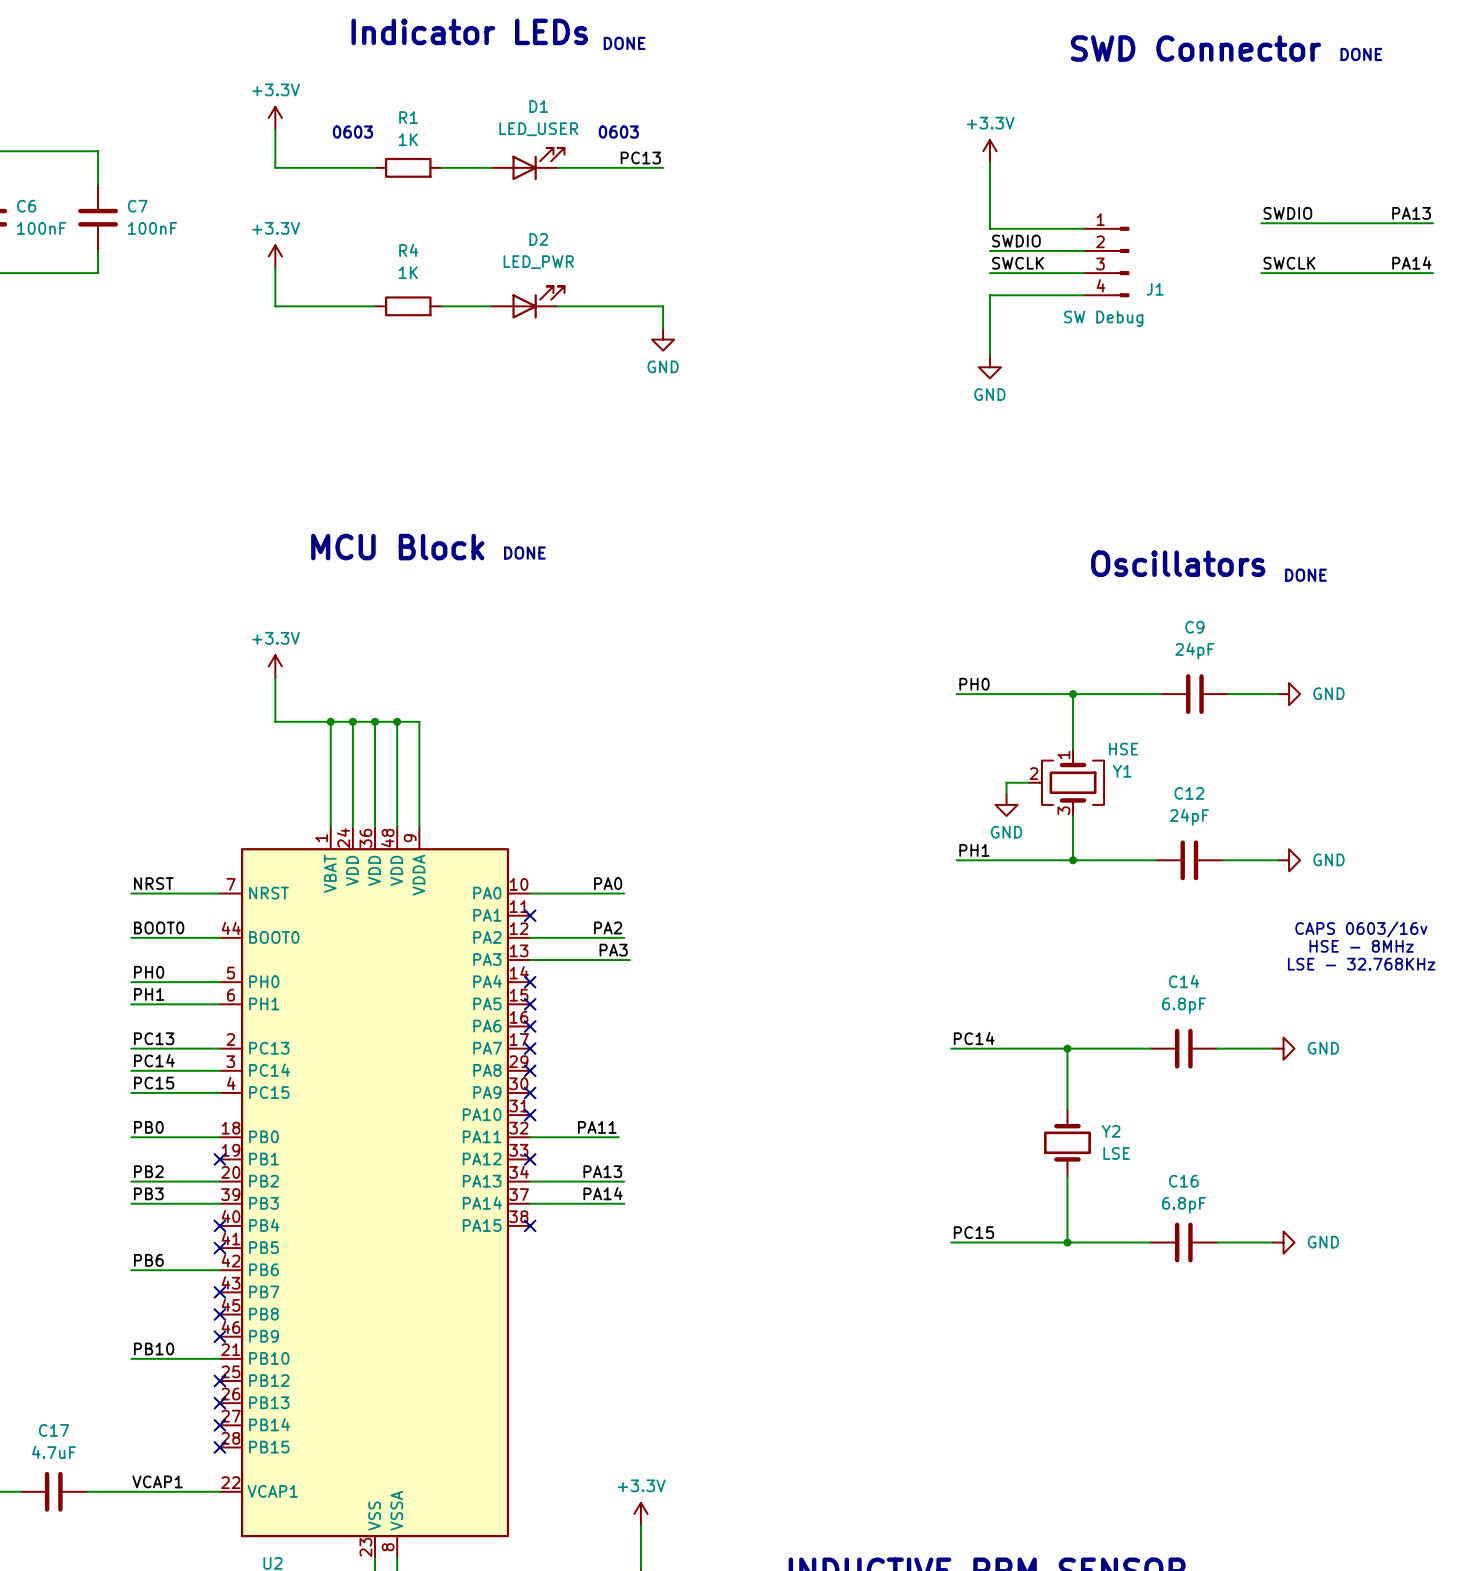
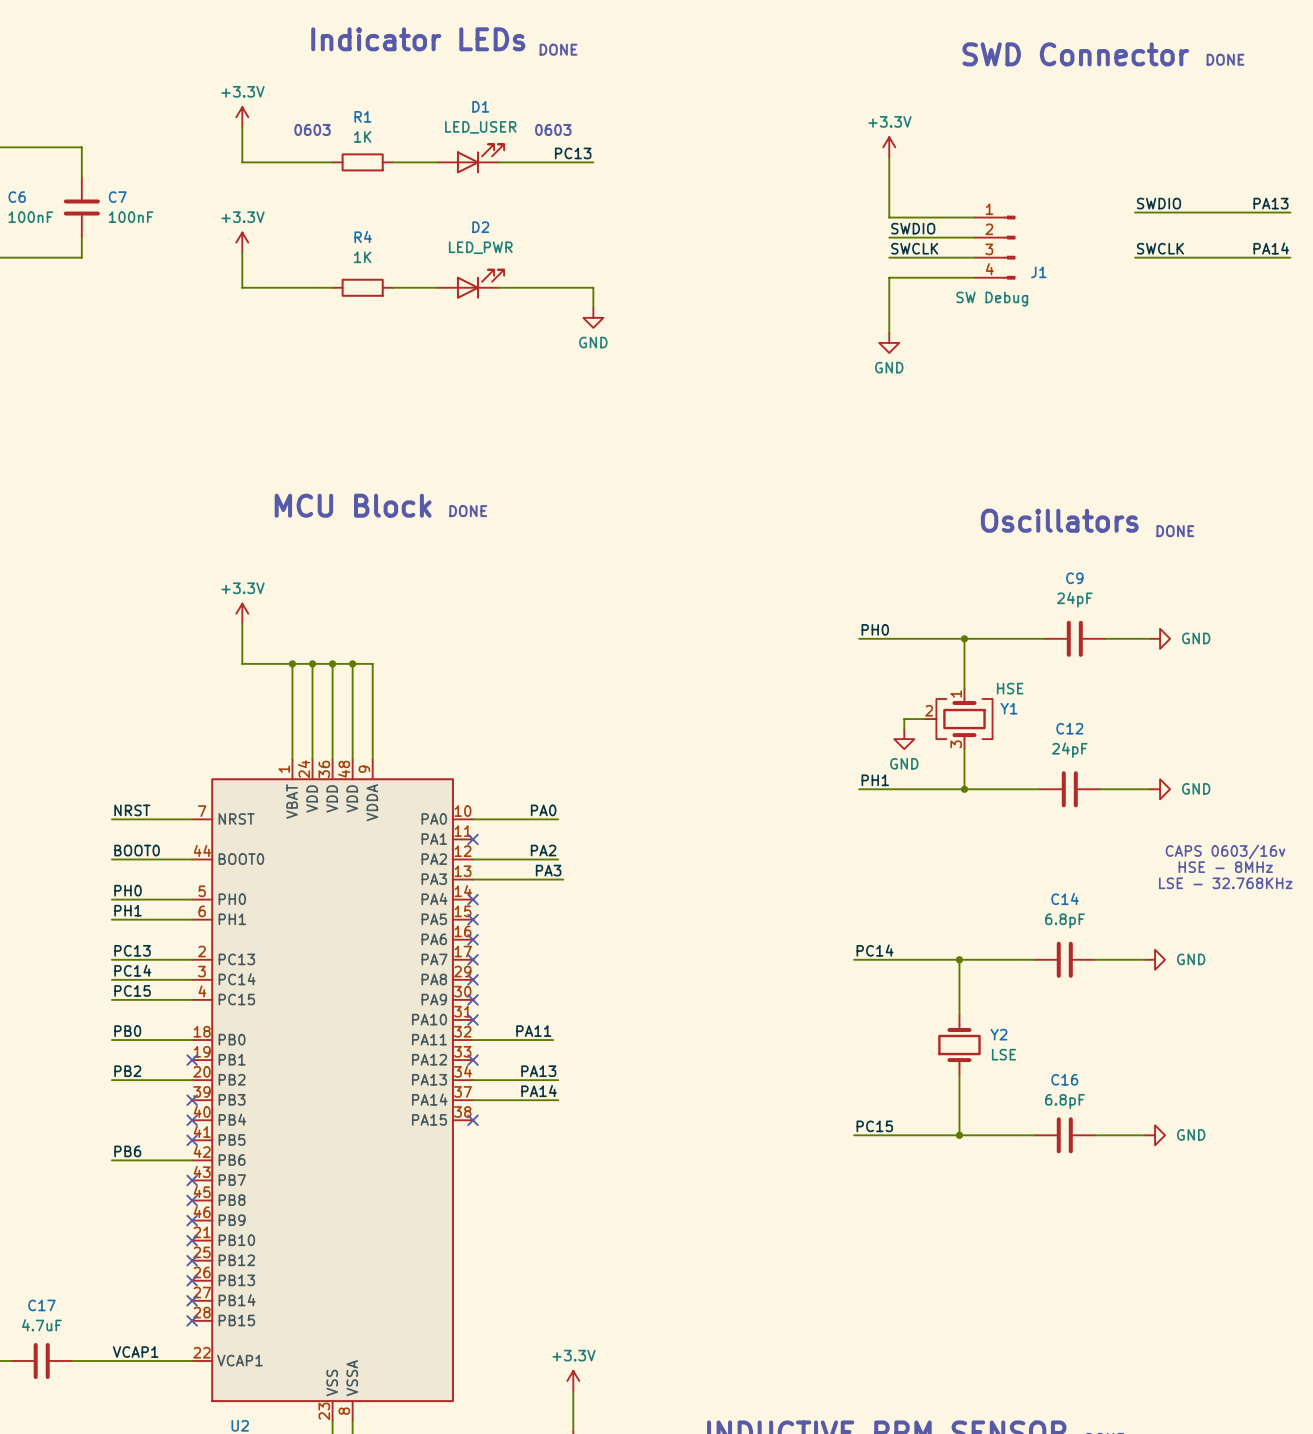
label: PB3 (148, 1193) -> none
wire: (131, 1203) (219, 1203) -> none
no-connect mark: none -> (192, 1100)
label: PB10 (154, 1348) -> none
wire: (131, 1358) (219, 1358) -> none
no-connect mark: none -> (192, 1240)

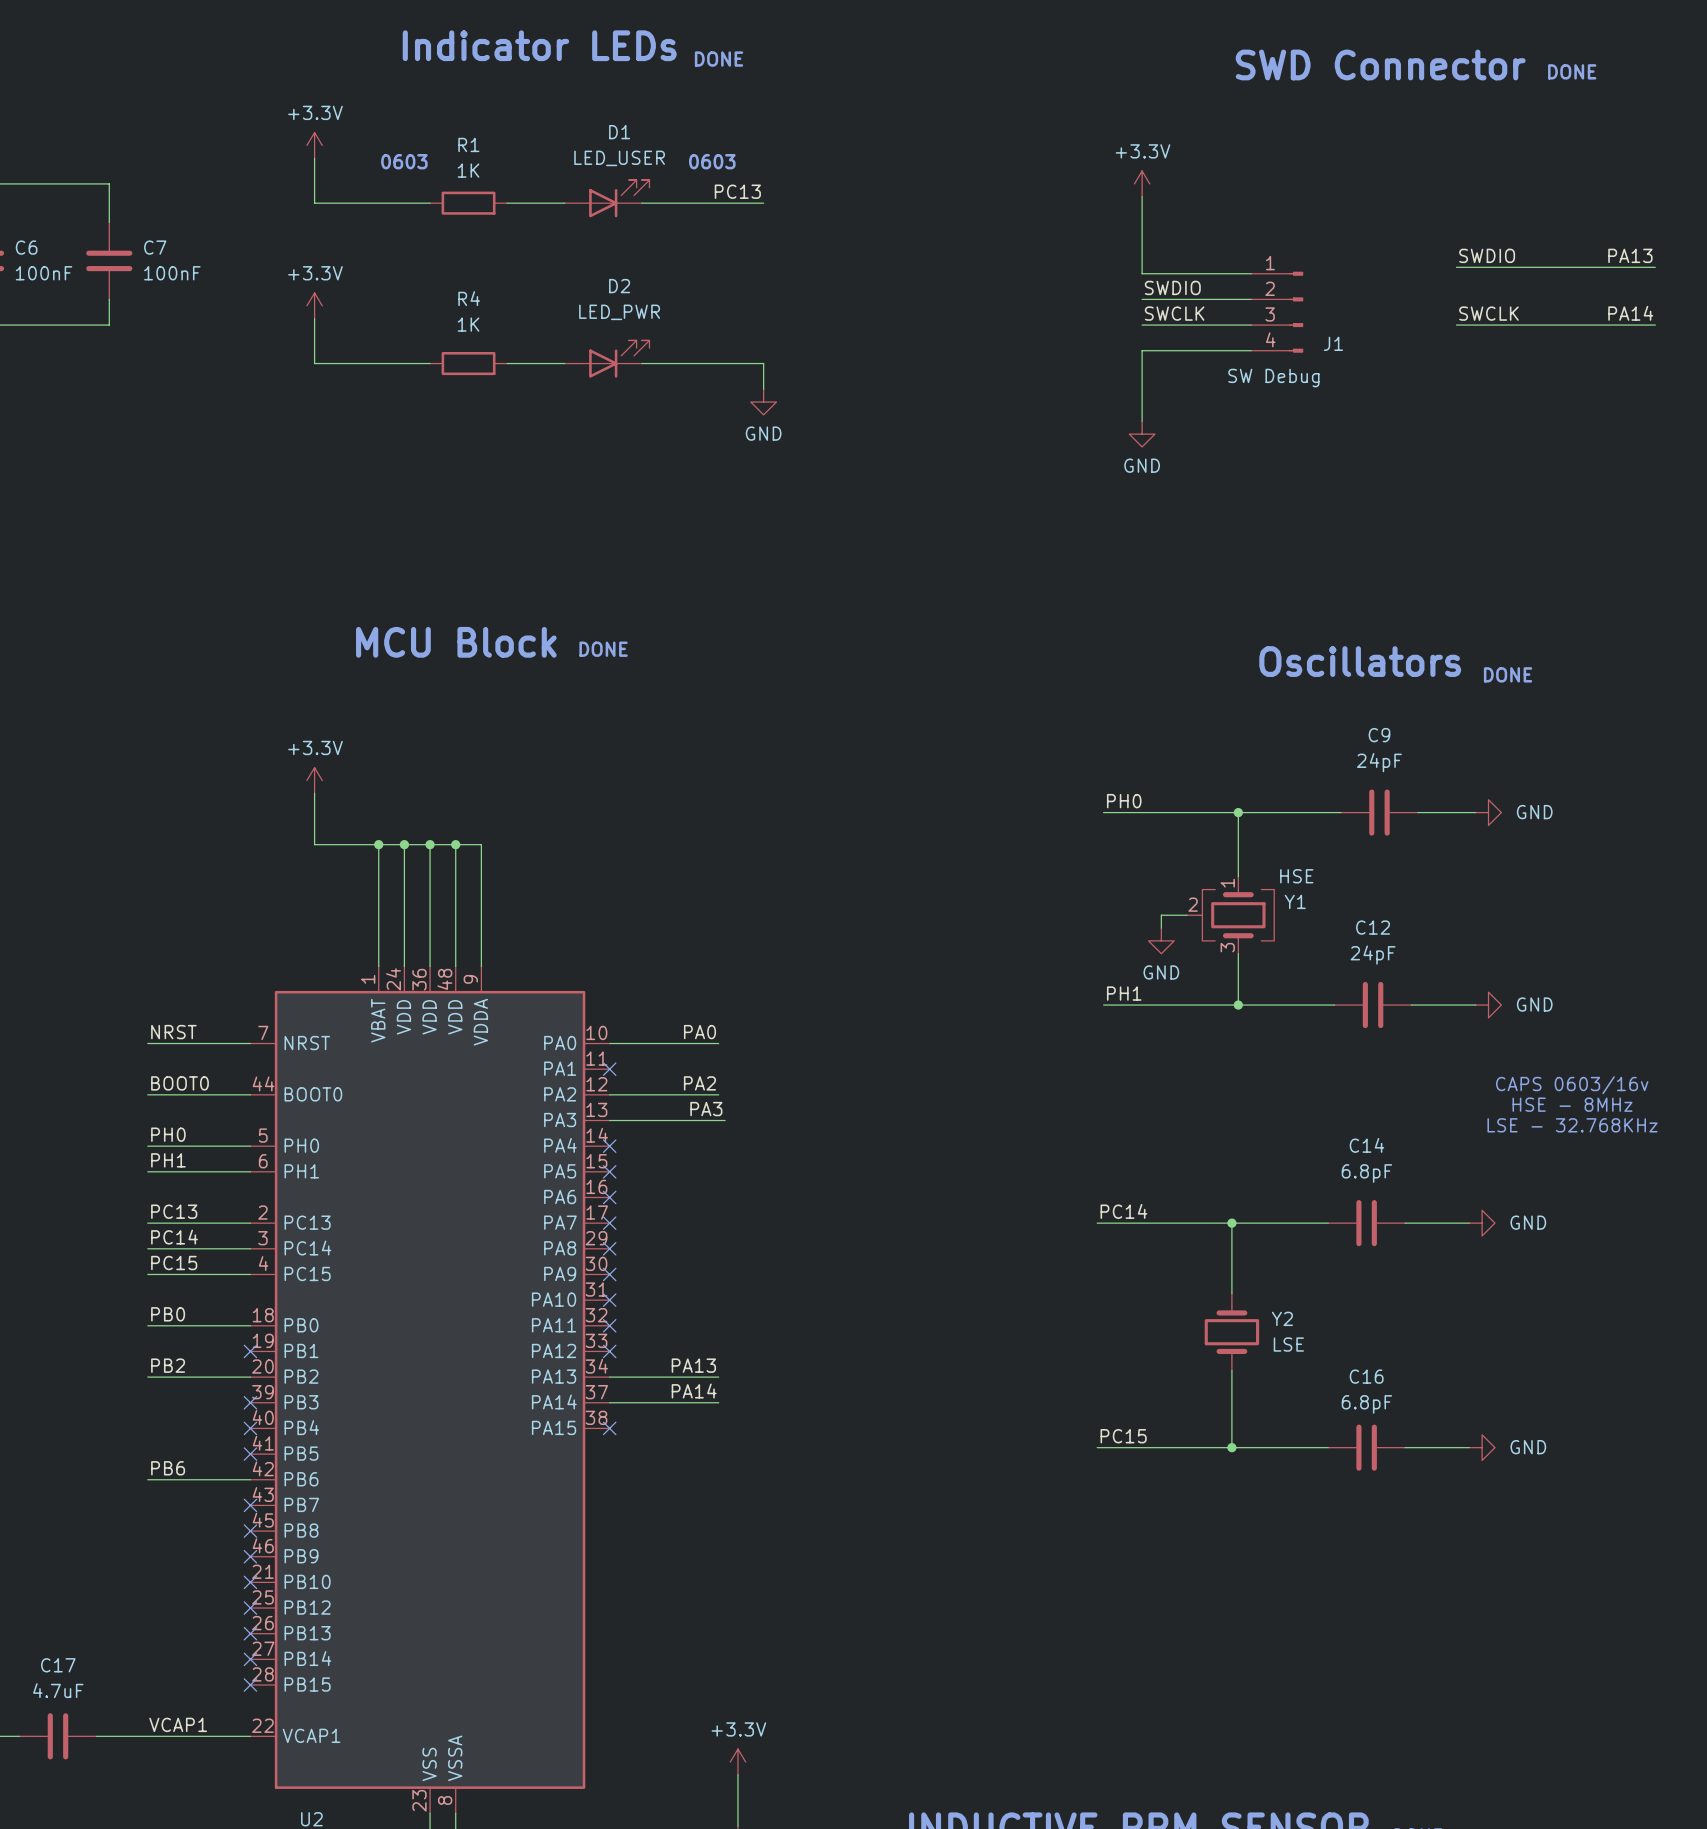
label: PA11 (533, 1031) -> none
wire: (473, 1040) (553, 1040) -> none
no-connect mark: none -> (609, 1325)

